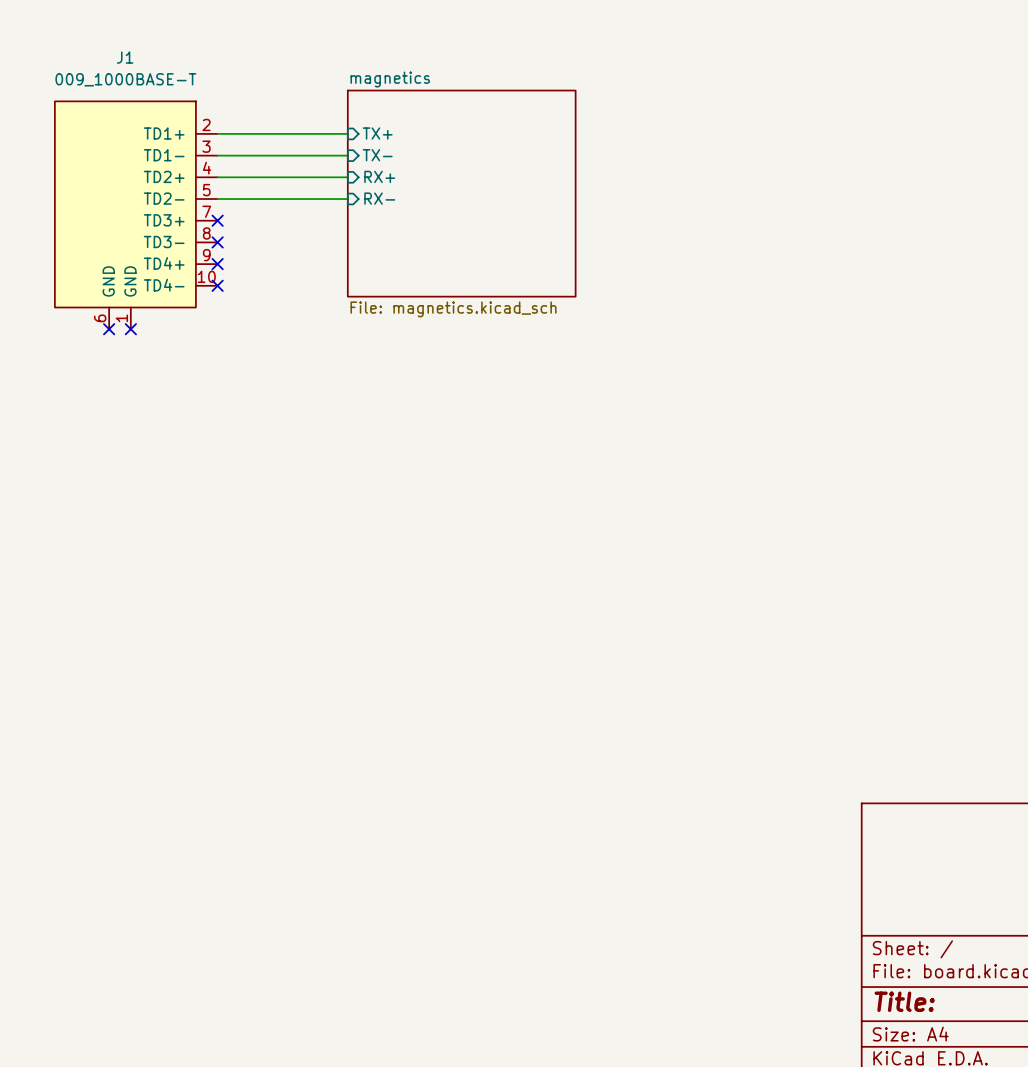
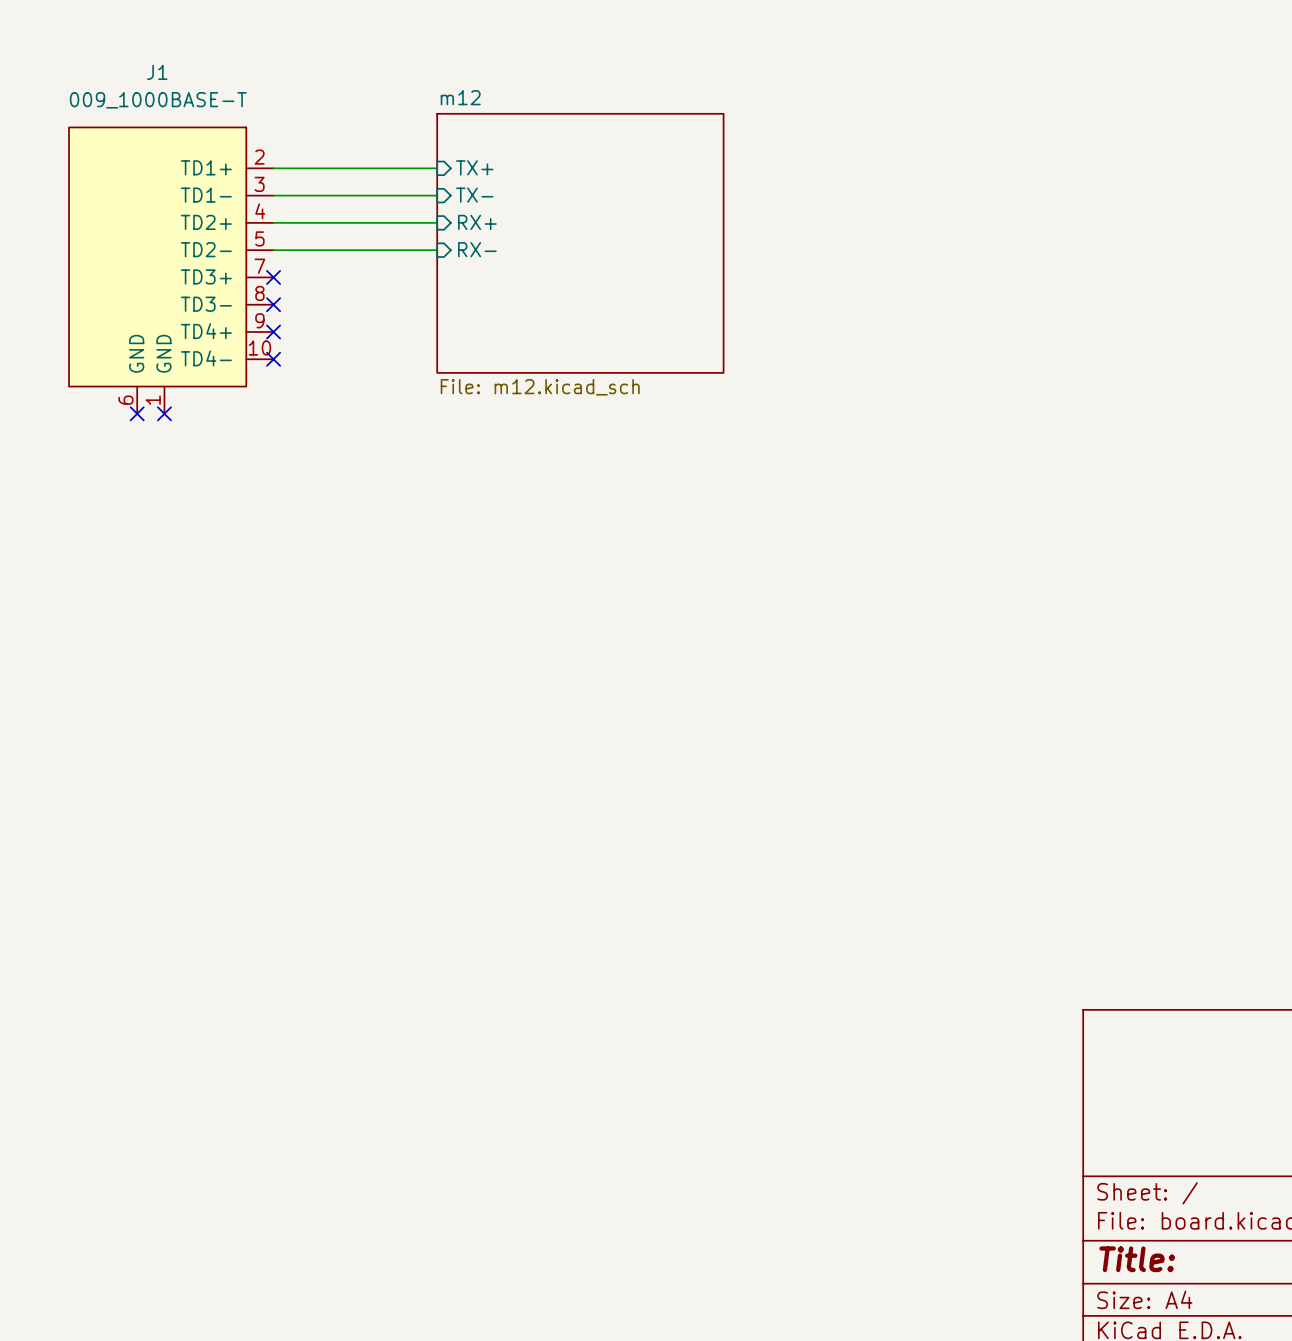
sheet magnetics name: magnetics (390, 79) -> m12 (460, 97)
sheet magnetics value: File: magnetics.kicad_sch (453, 309) -> File: m12.kicad_sch (540, 387)

